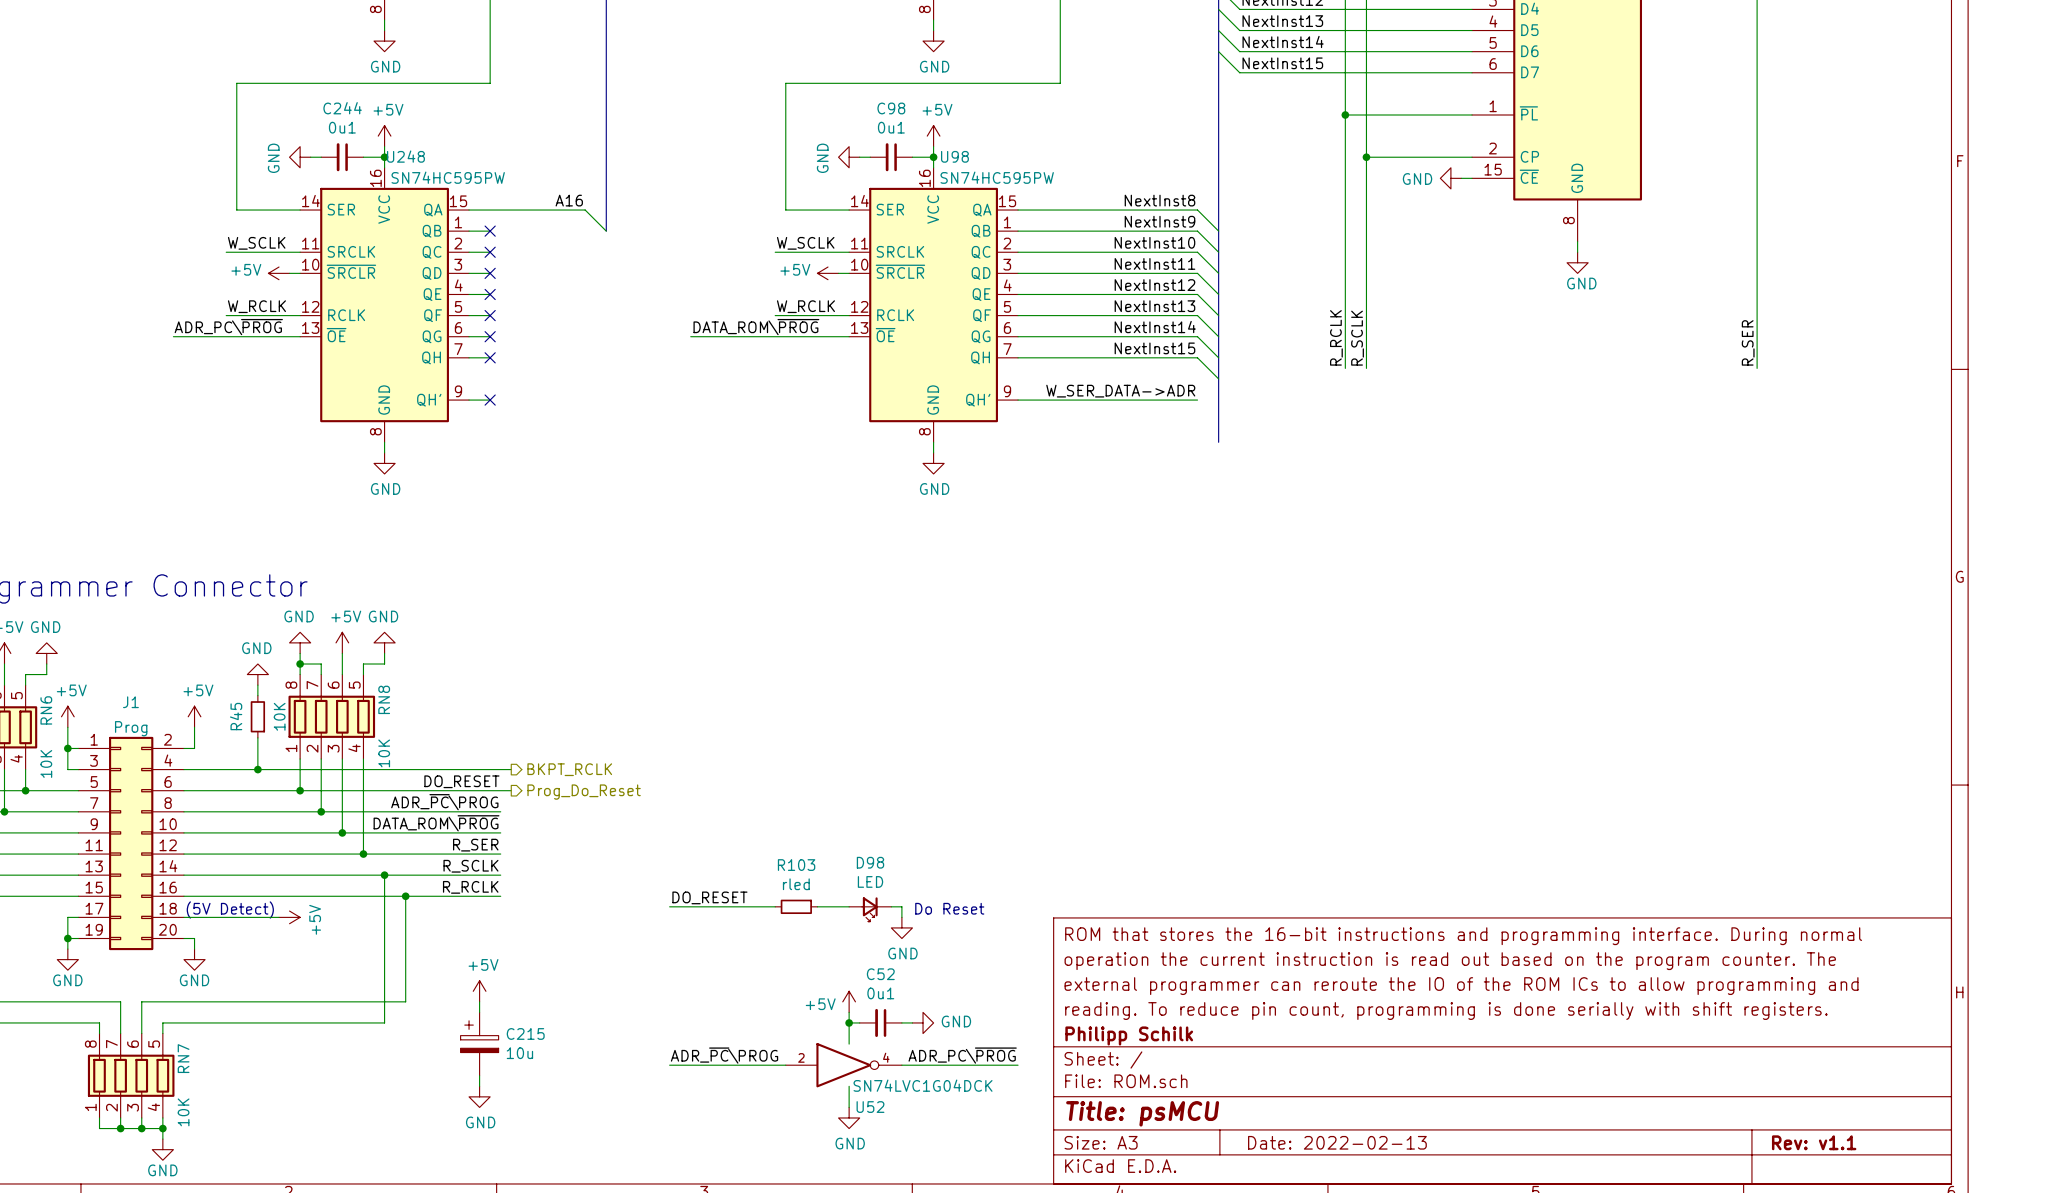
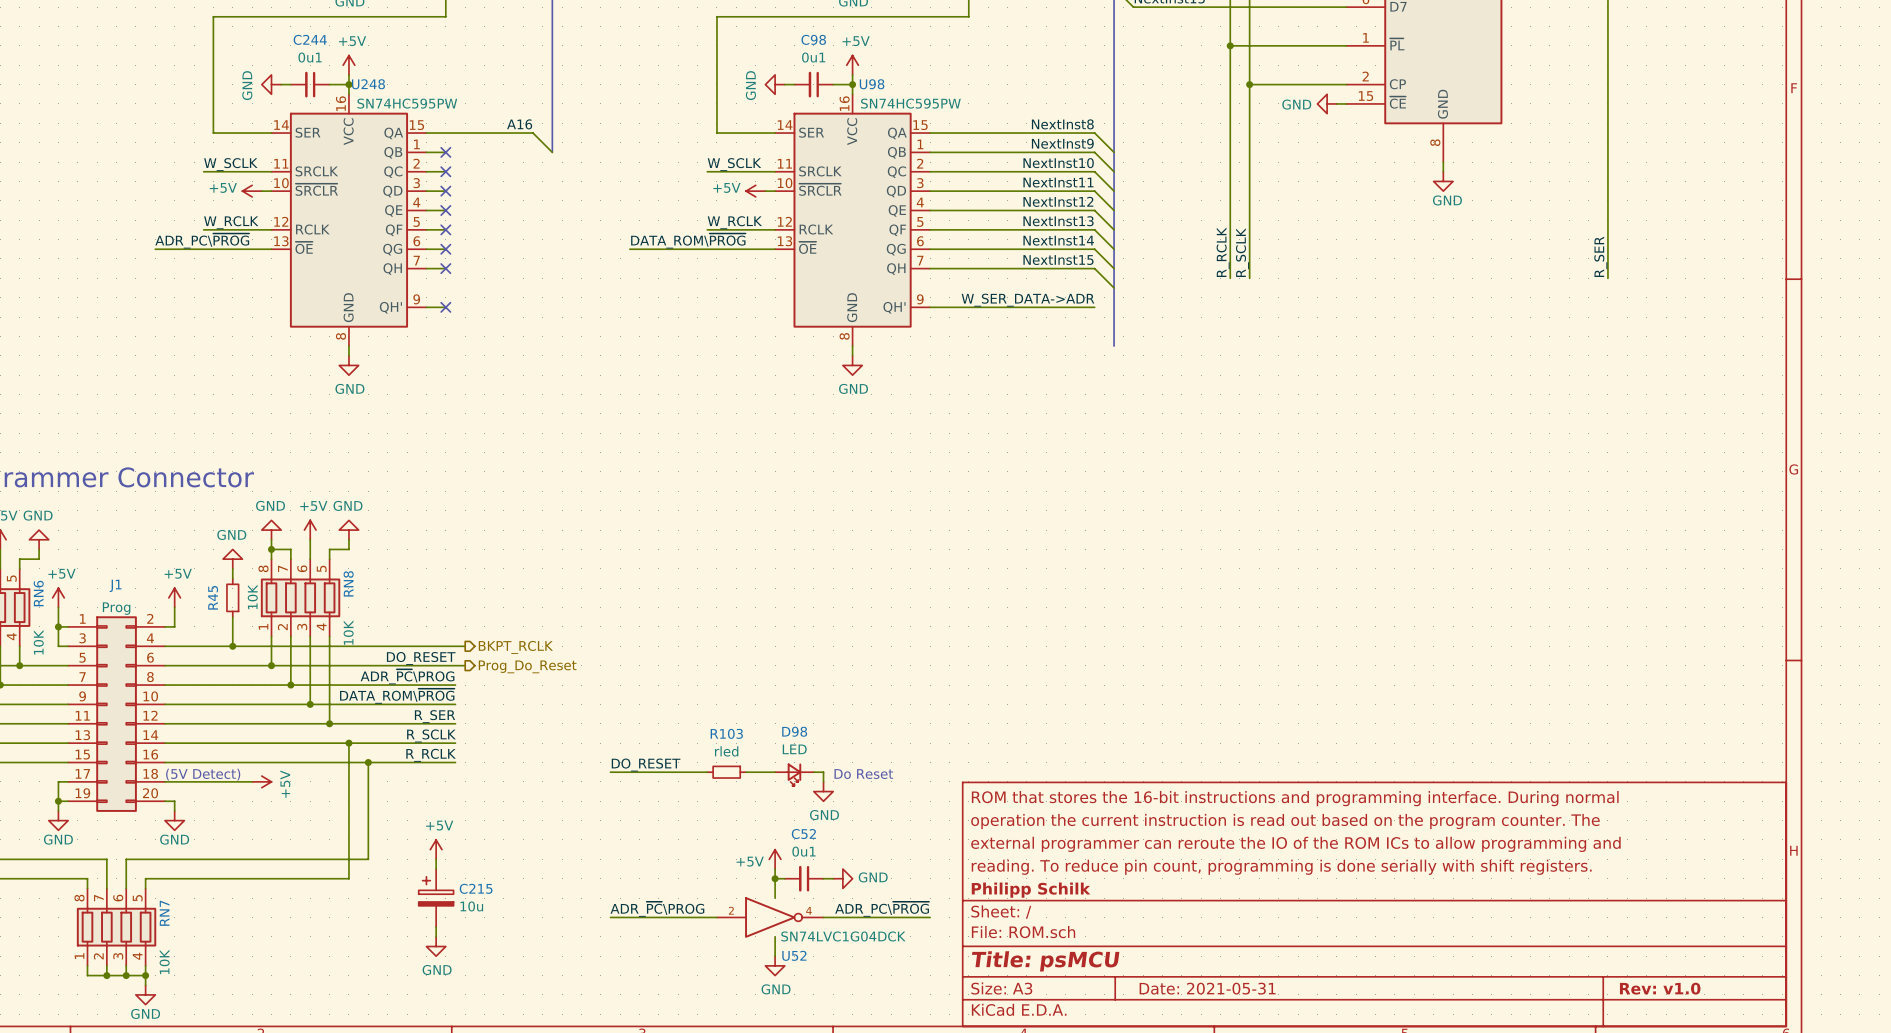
title block: Date: 2022-02-13 (1337, 1142) -> Date: 2021-05-31 (1207, 988)
title block: Rev: v1.1 (1814, 1142) -> Rev: v1.0 (1660, 988)

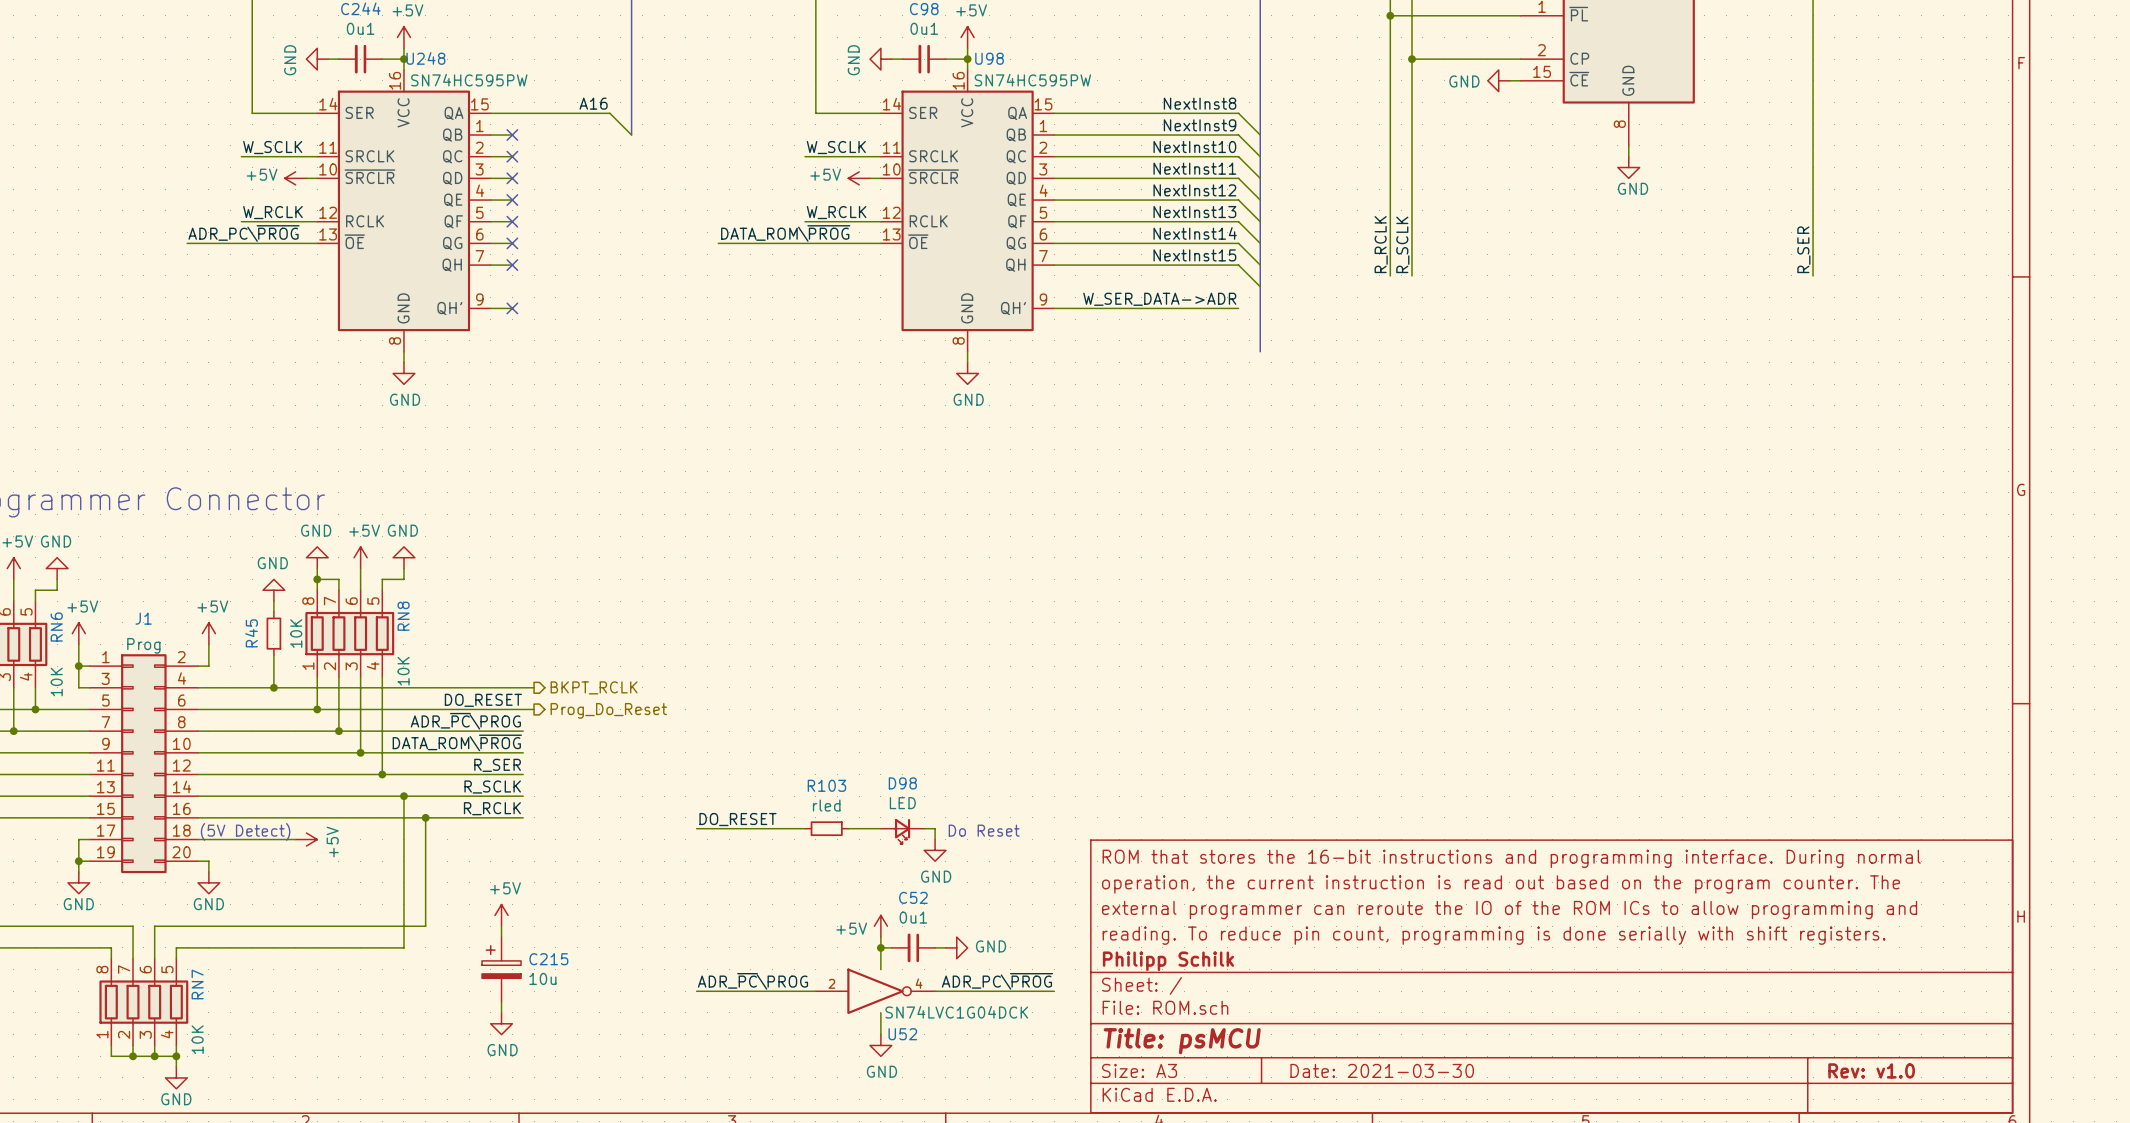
title block: operation the current instruction is read out based on the program counter. The (1285, 821) -> operation, the current instruction is read out based on the program counter. The (1501, 884)
title block: Date: 2021-05-31 (1207, 988) -> Date: 2021-03-30 (1382, 1070)

